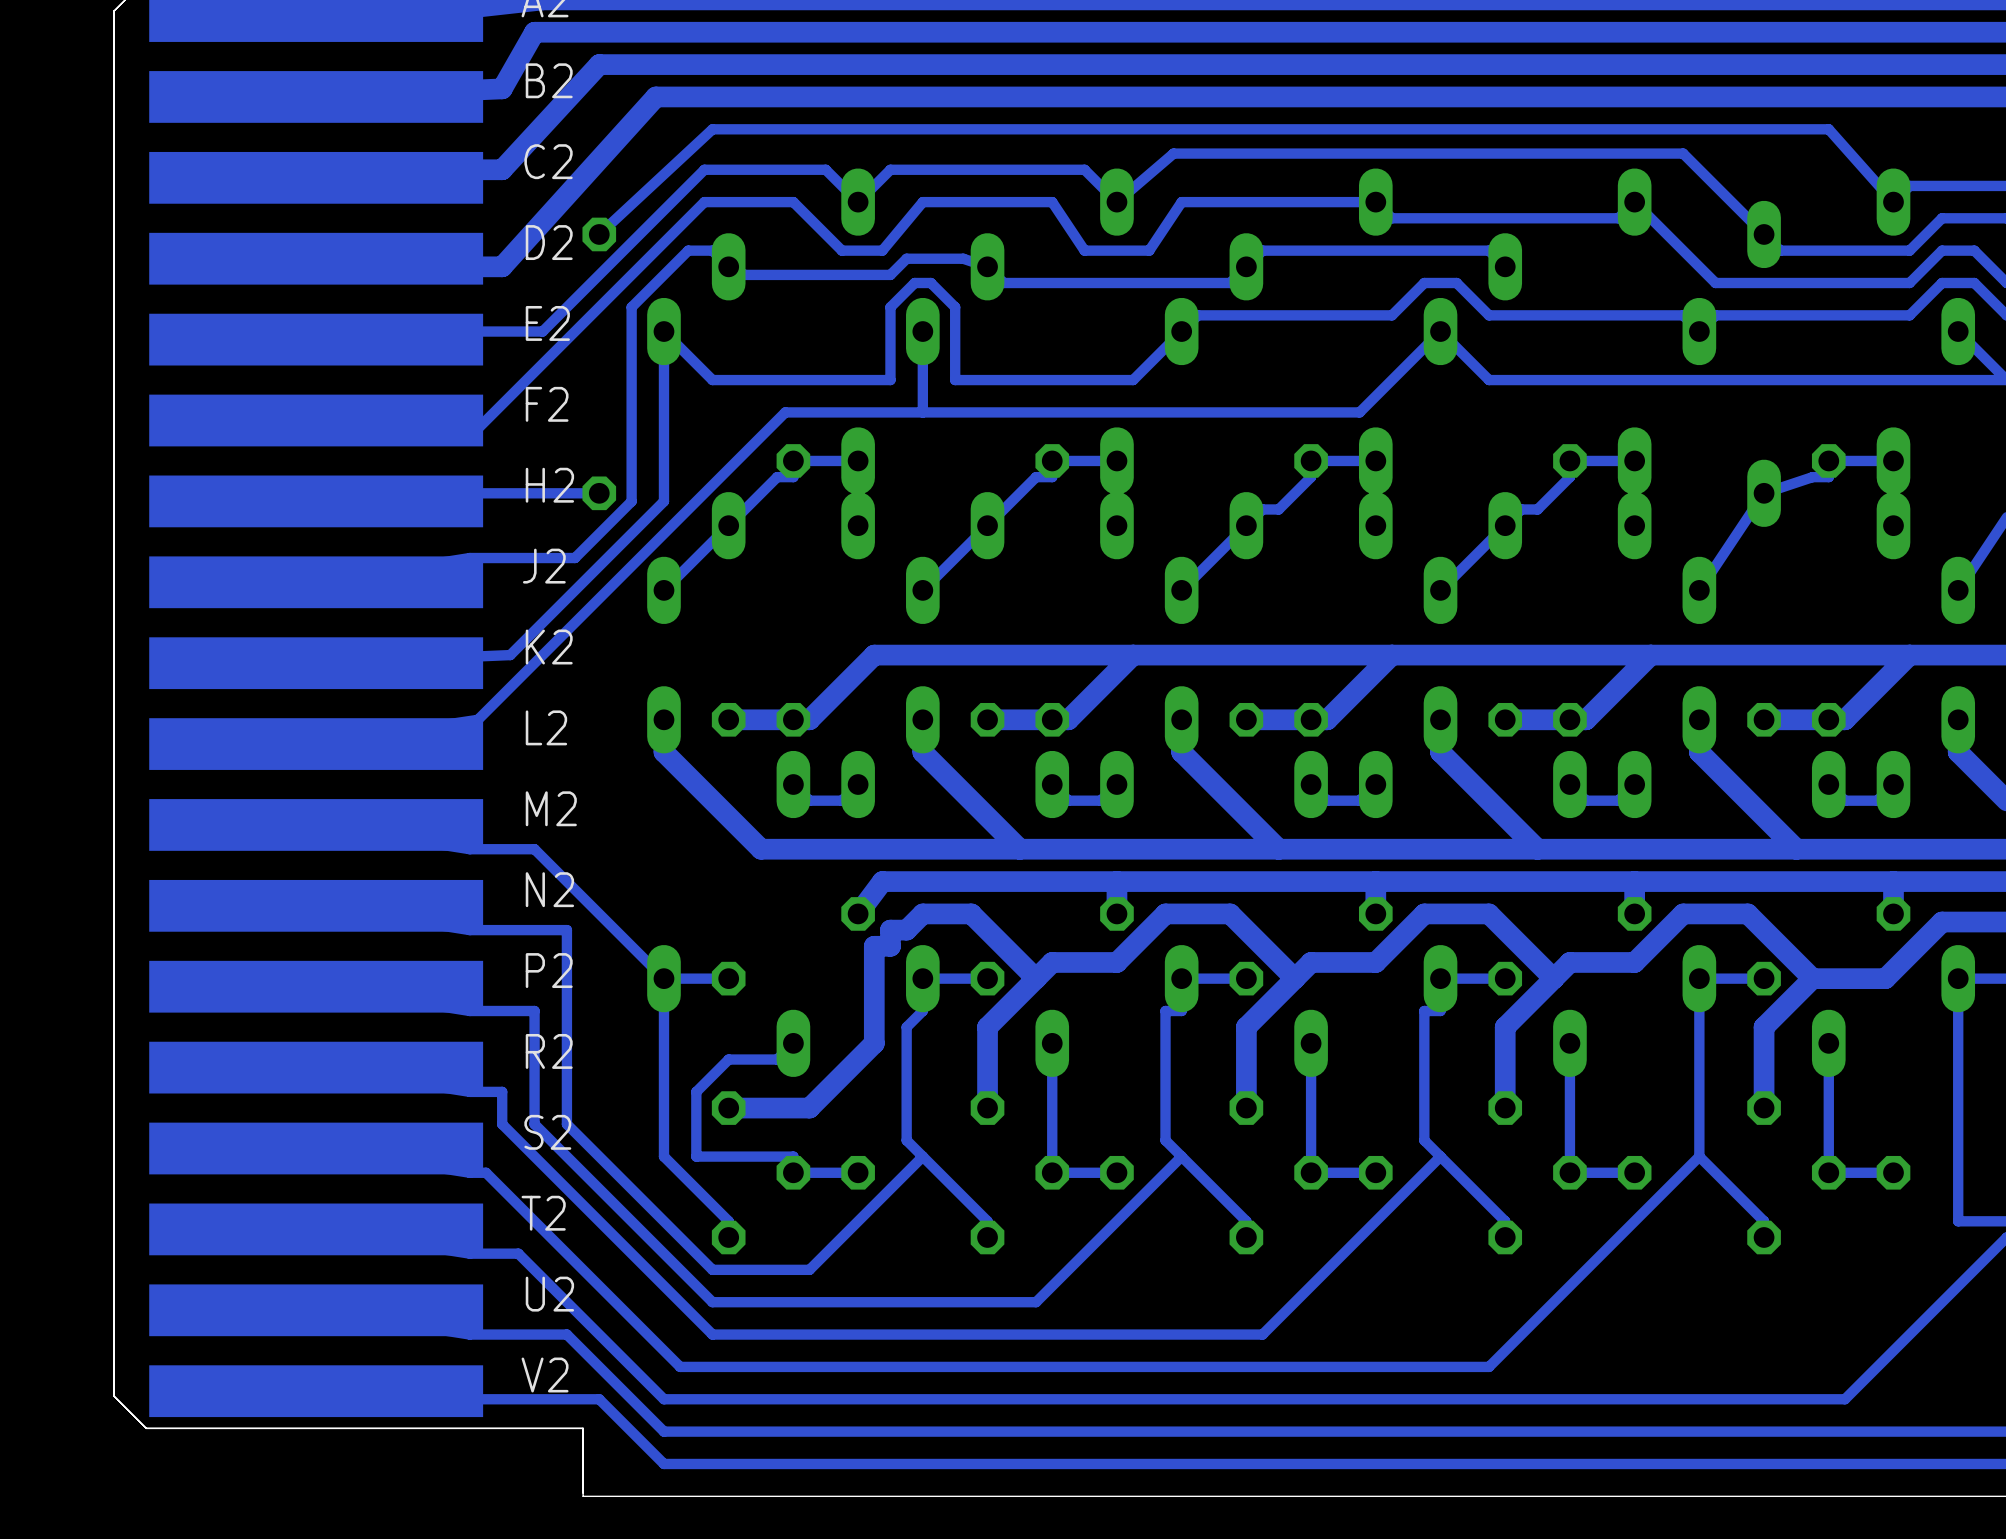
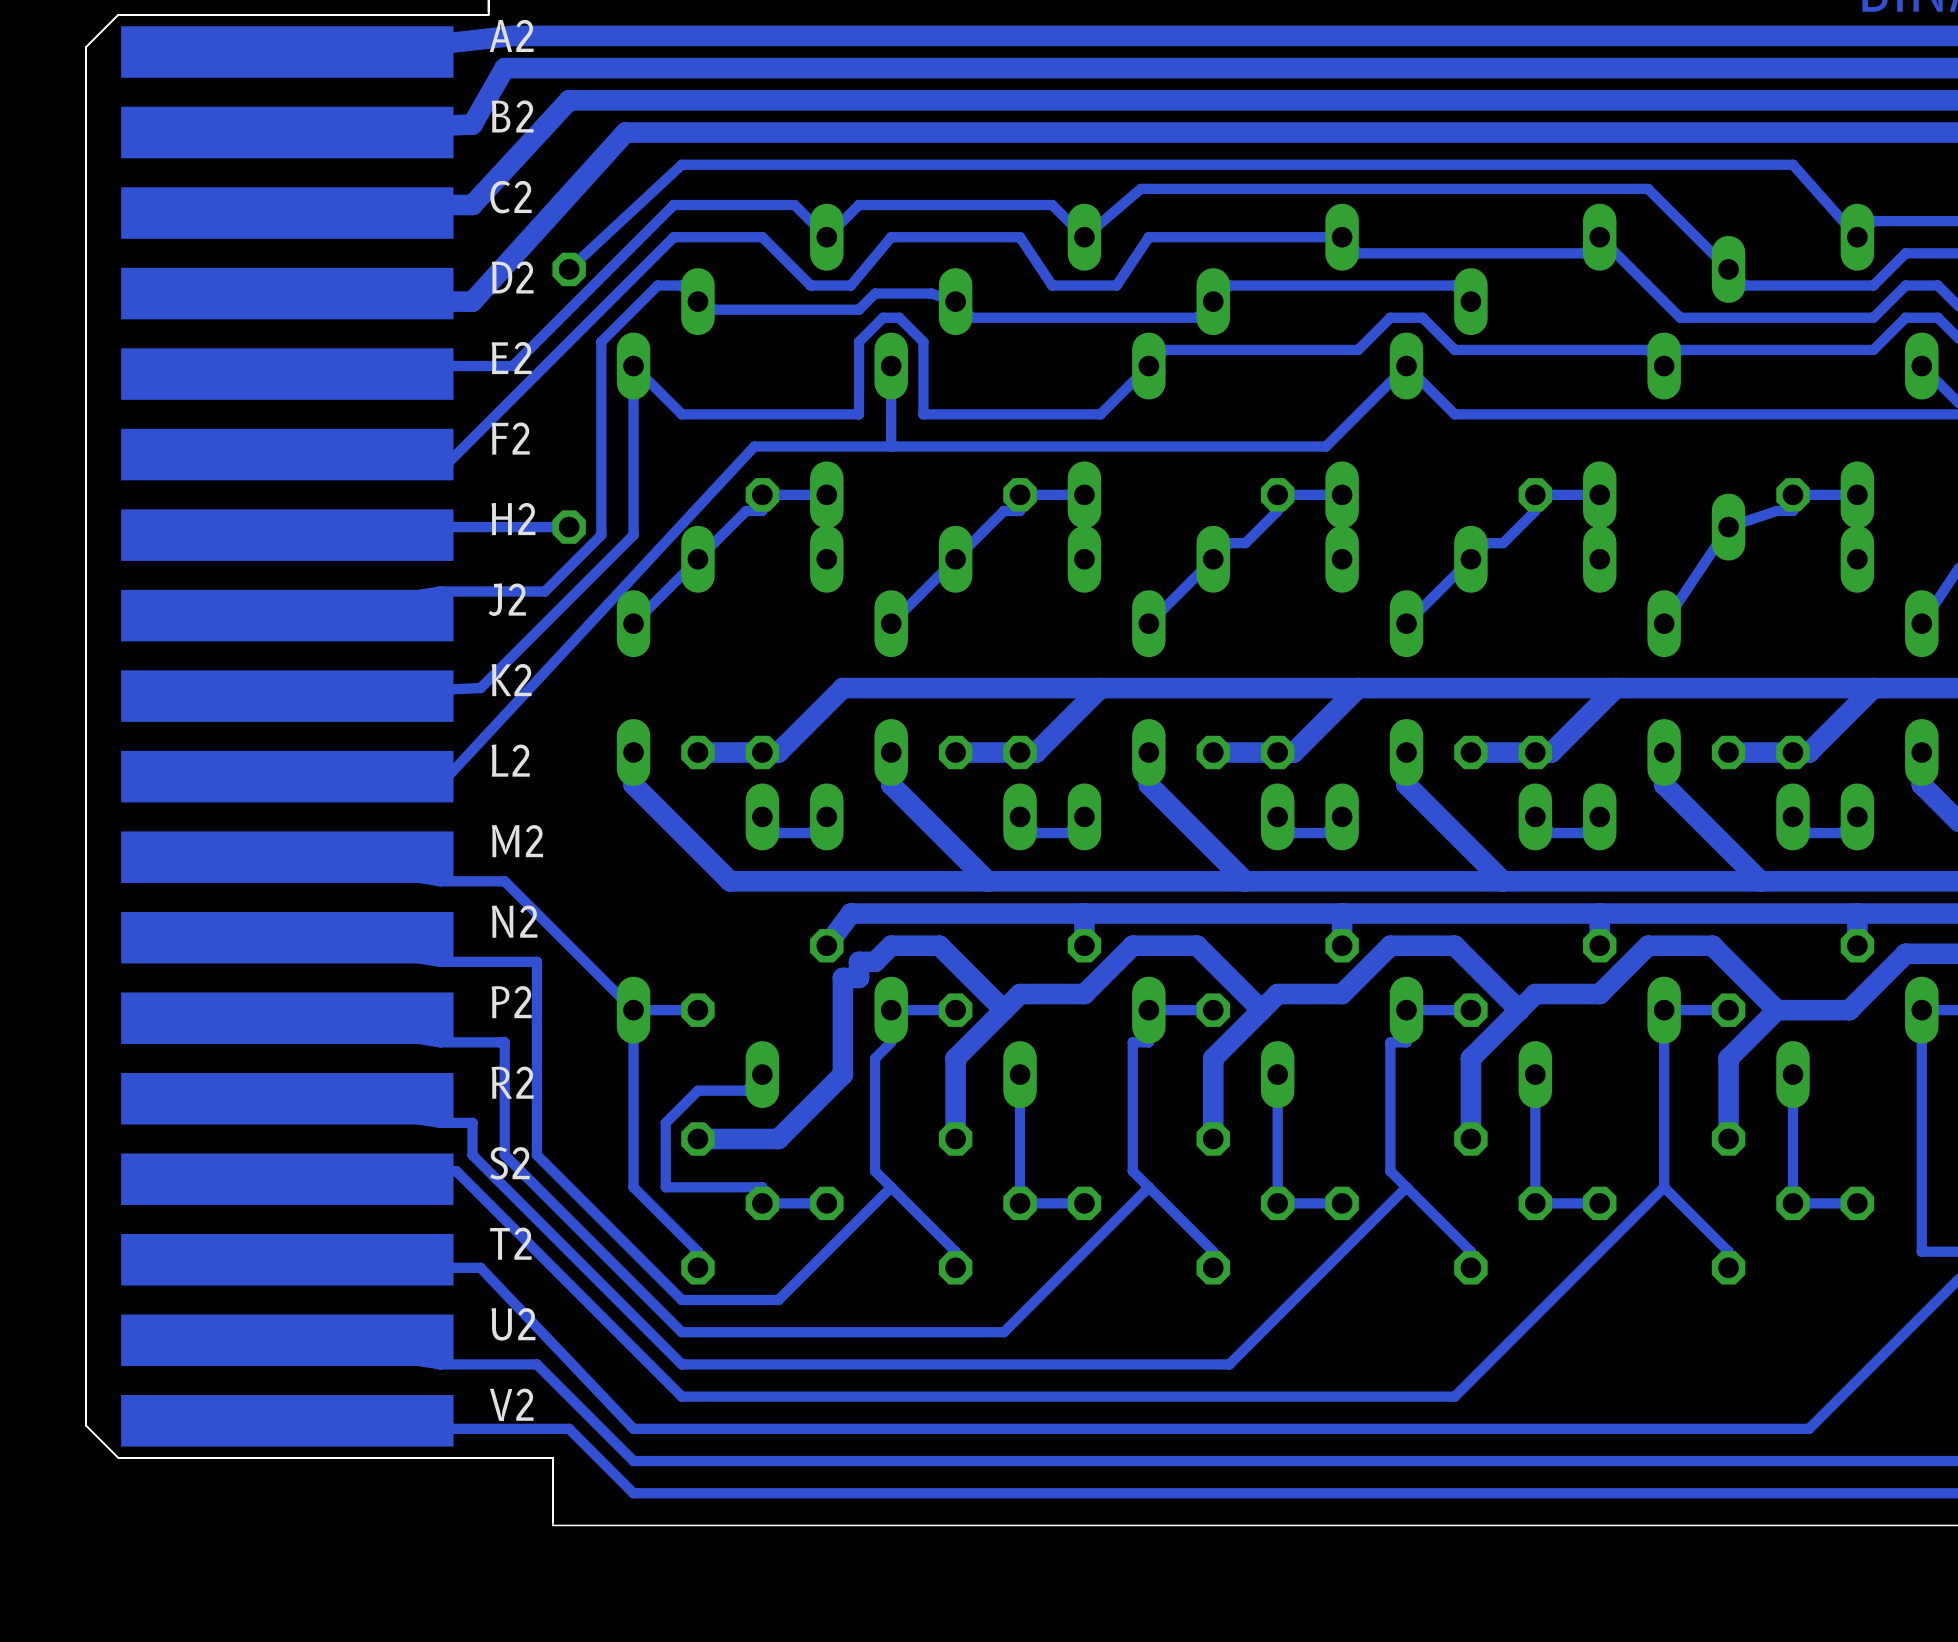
bottom track: (785, 412) (477, 719) (316, 744) -> (754, 446) (440, 784) (287, 776)
bottom track: (316, 1148) (469, 1172) (486, 1172) (680, 1366) (712, 1366) -> (287, 1179) (456, 1171) (681, 1396)
bottom track: (316, 1229) (469, 1253) (518, 1253) (663, 1399) -> (287, 1259) (432, 1267) (480, 1267) (633, 1428)

